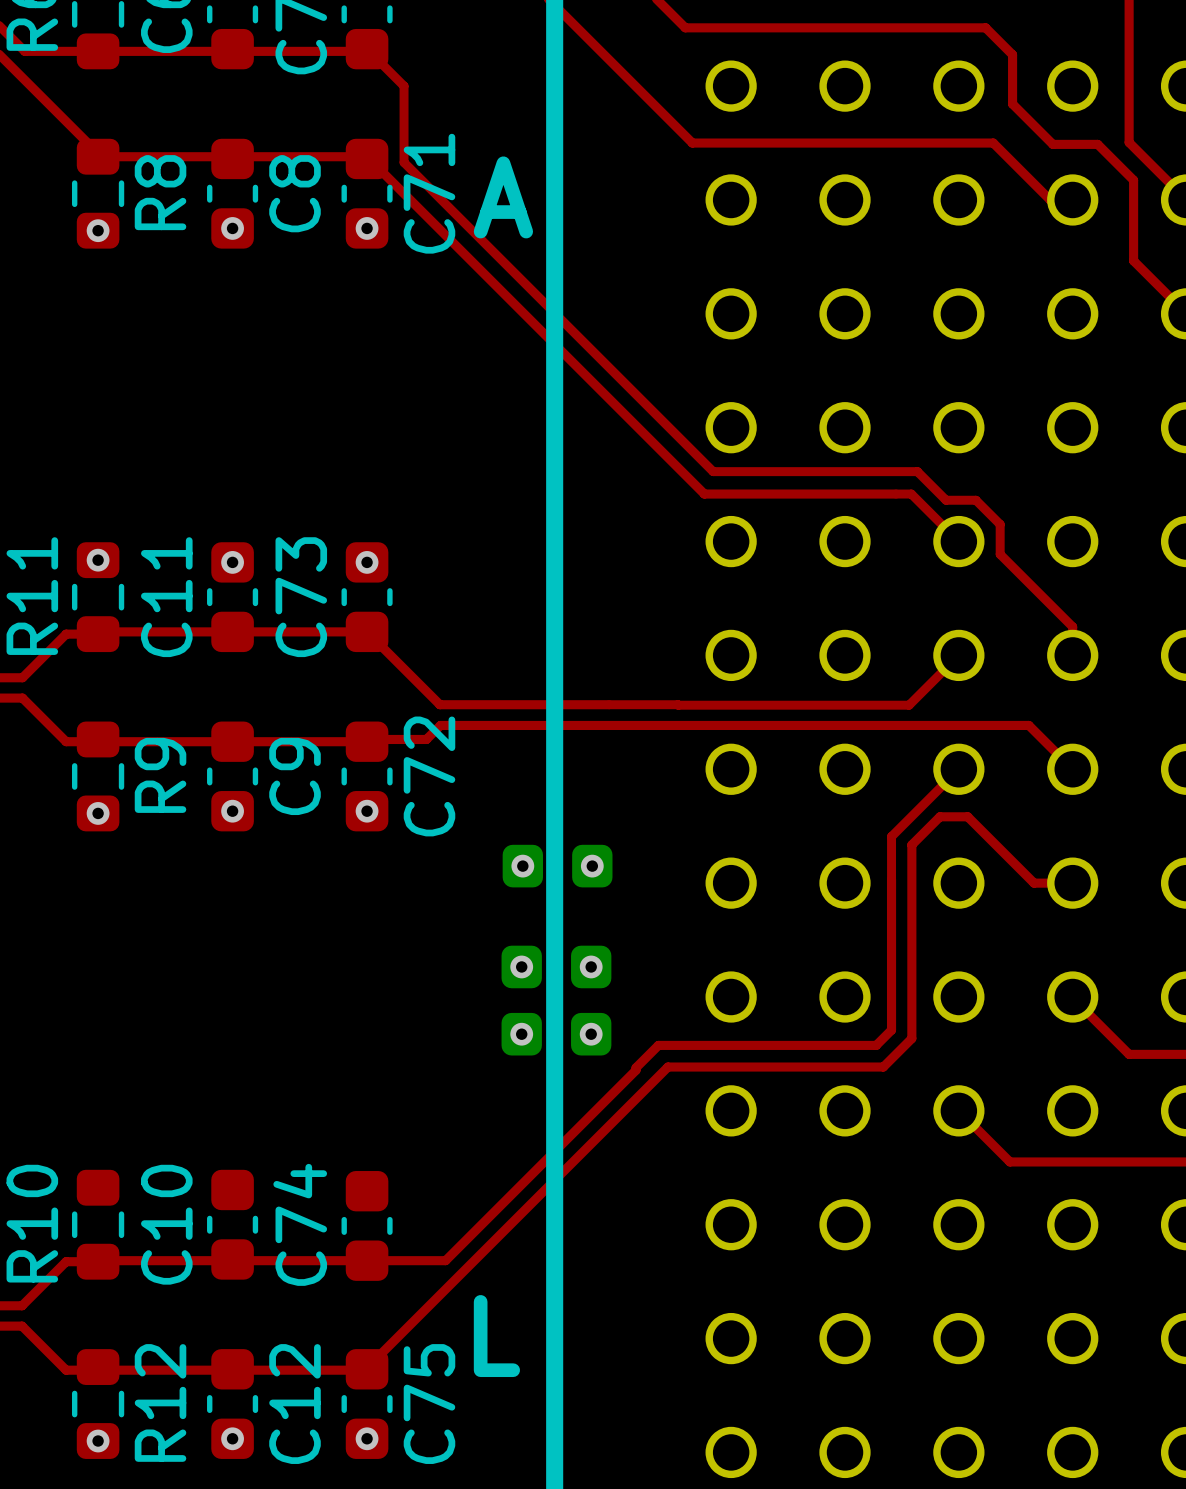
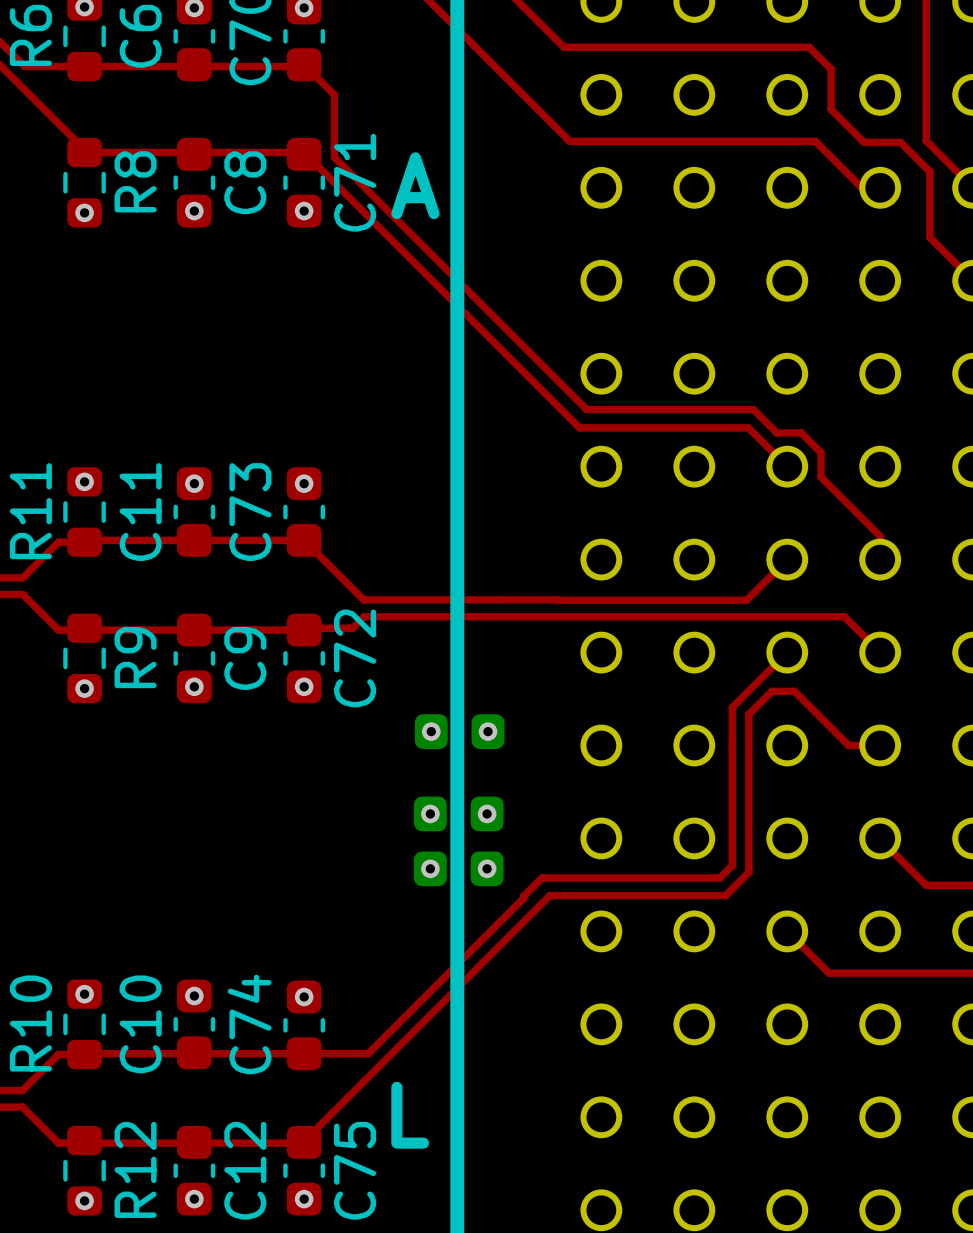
via: none -> (84, 994)
via: none -> (194, 996)
via: none -> (304, 996)

